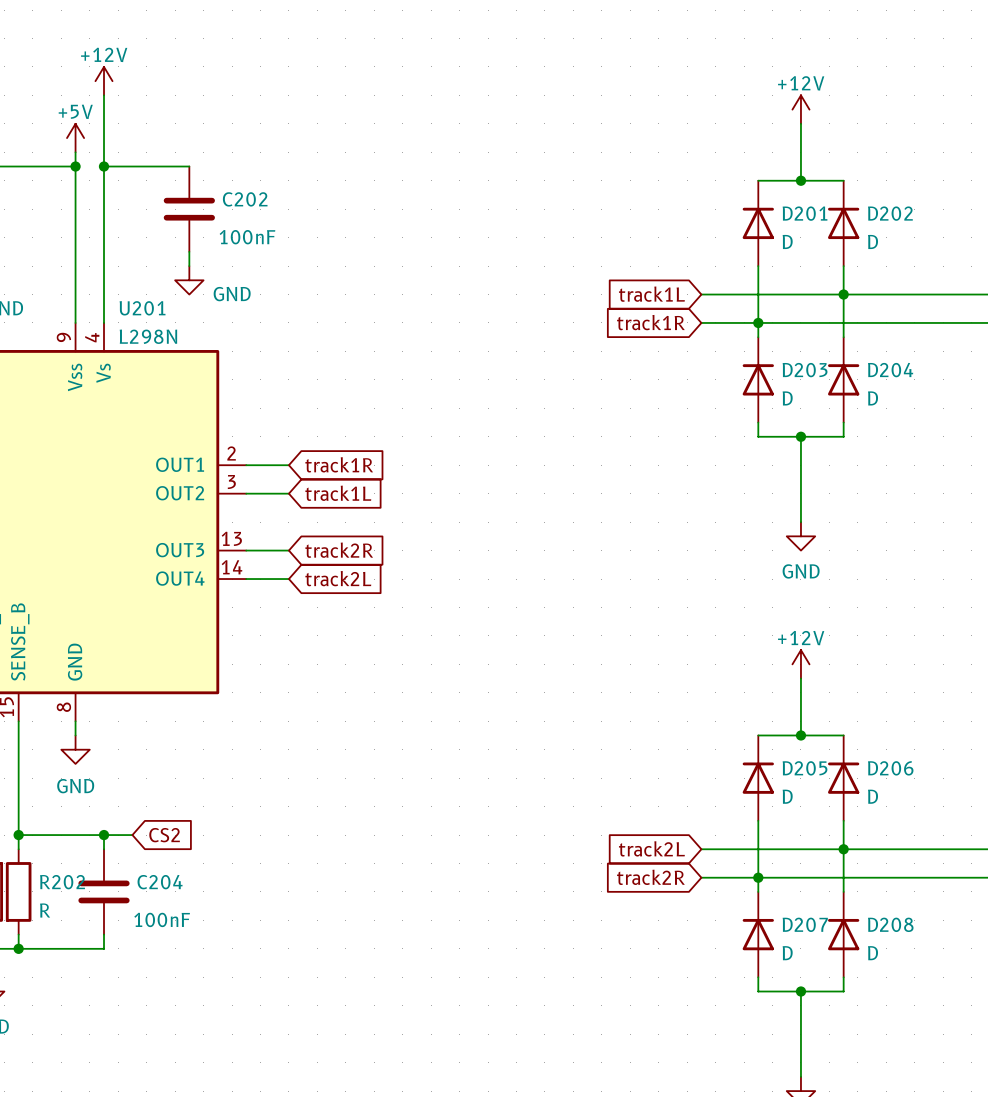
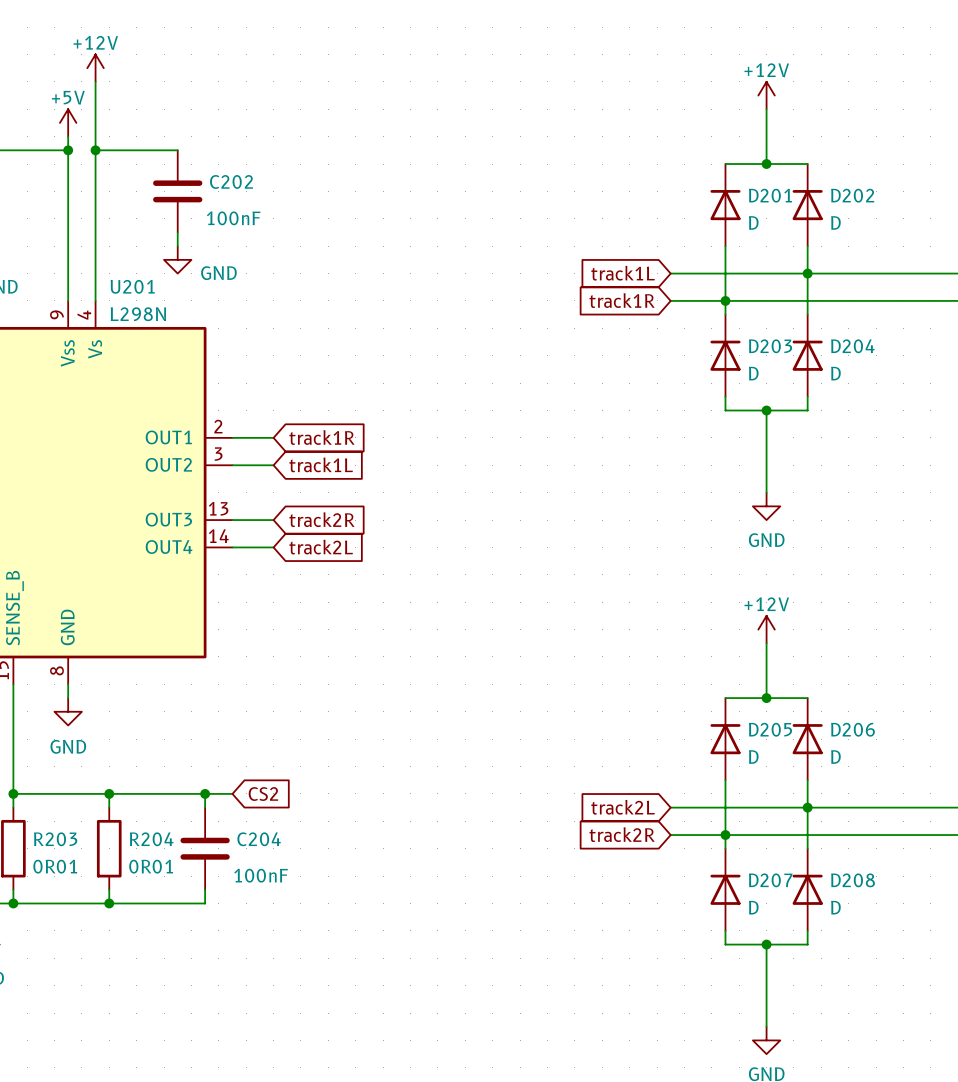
wire: (104, 835) (104, 849) -> (109, 793) (109, 807)
junction position: (104, 835) -> (109, 793)
wire: none -> (122, 793) (232, 793)
global label position: CS2 (164, 835) -> CS2 (263, 794)
wire: none -> (205, 793) (205, 807)
junction: none -> (205, 793)
R202 name: R202 (62, 882) -> R203 (55, 839)
C204 position: (104, 891) -> (205, 848)
R204: none -> 0R01 (109, 848)
R202 value: R (45, 910) -> 0R01 (55, 866)
wire: (104, 934) (104, 948) -> (205, 889) (205, 903) (95, 903)
wire: none -> (109, 889) (109, 903)
junction: none -> (109, 903)

